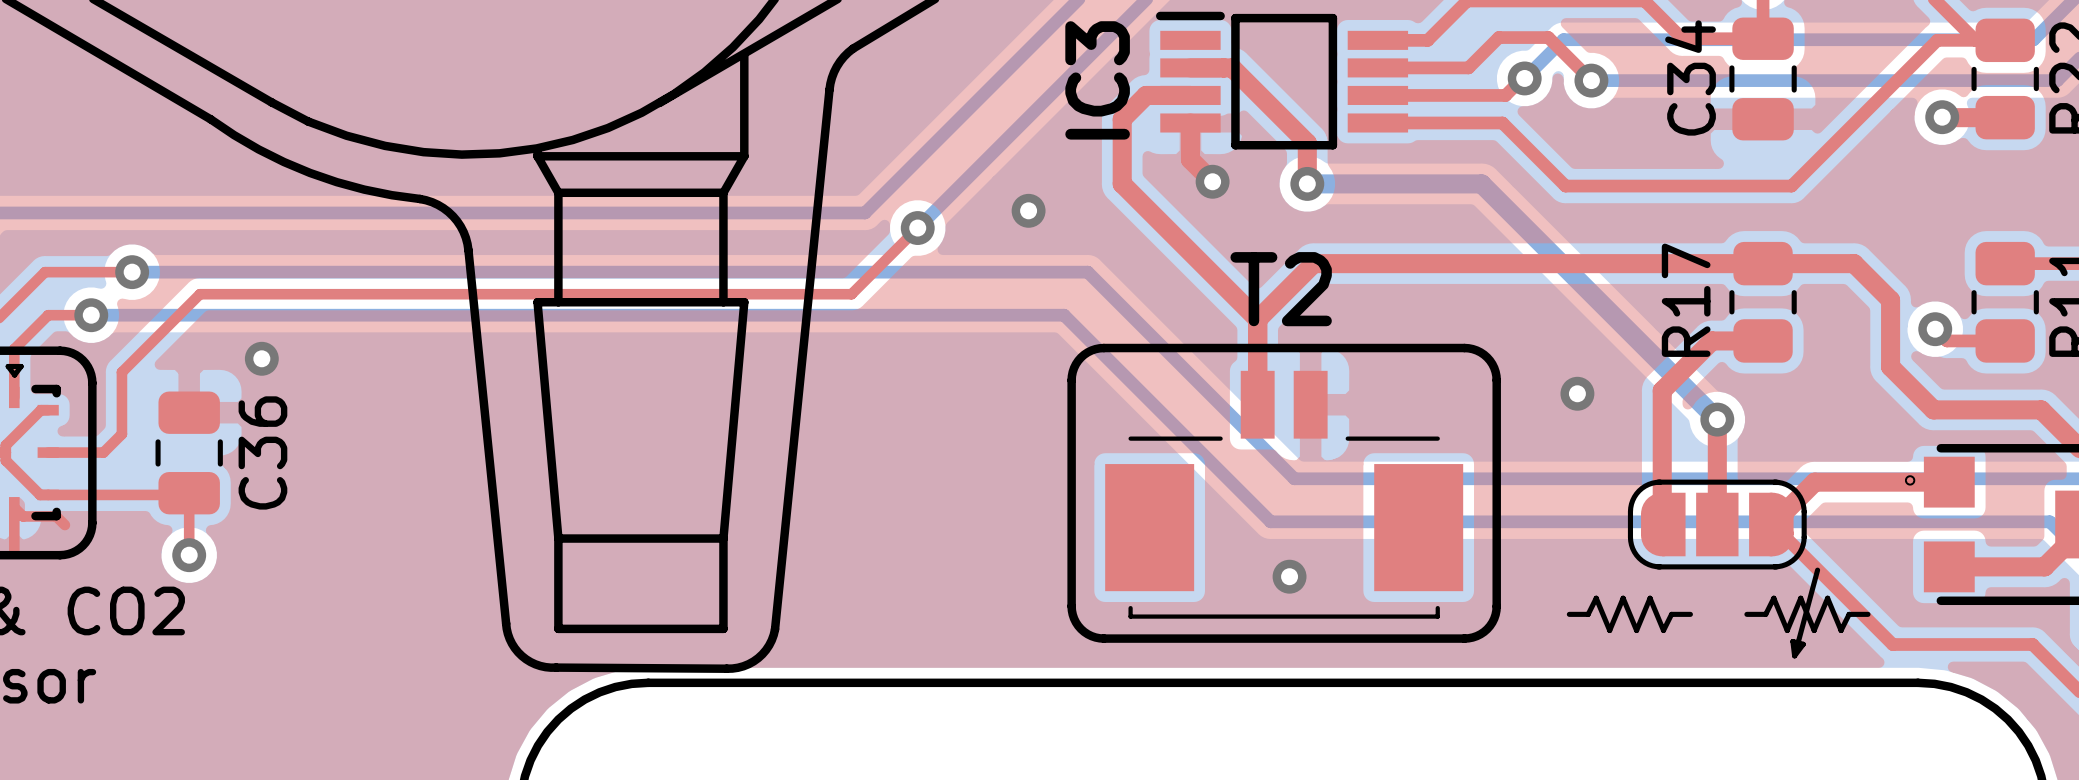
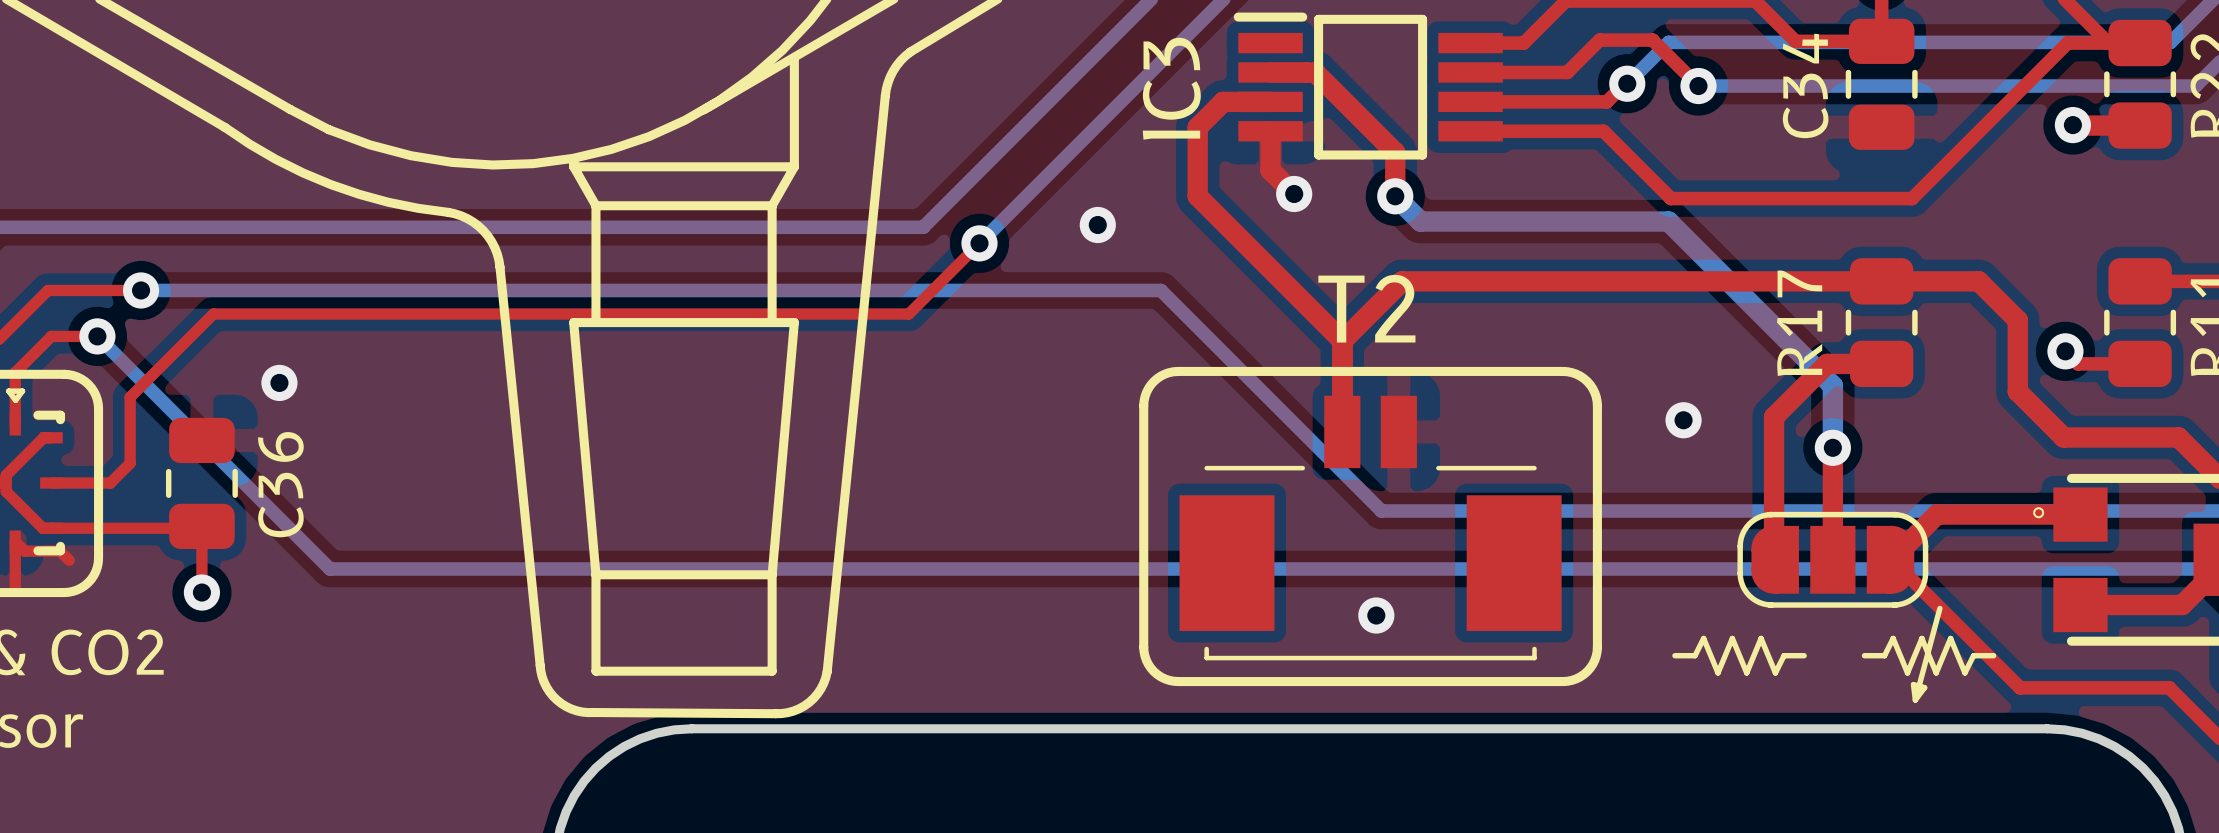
bottom track: (1307, 183) (1481, 183) (1717, 419) -> (1395, 196) (1420, 221) (1668, 221) (1832, 385) (1832, 447)
bottom track: (91, 315) (1064, 315) (1270, 521) (2049, 521) (2061, 533) -> (97, 336) (329, 568) (2199, 568)

